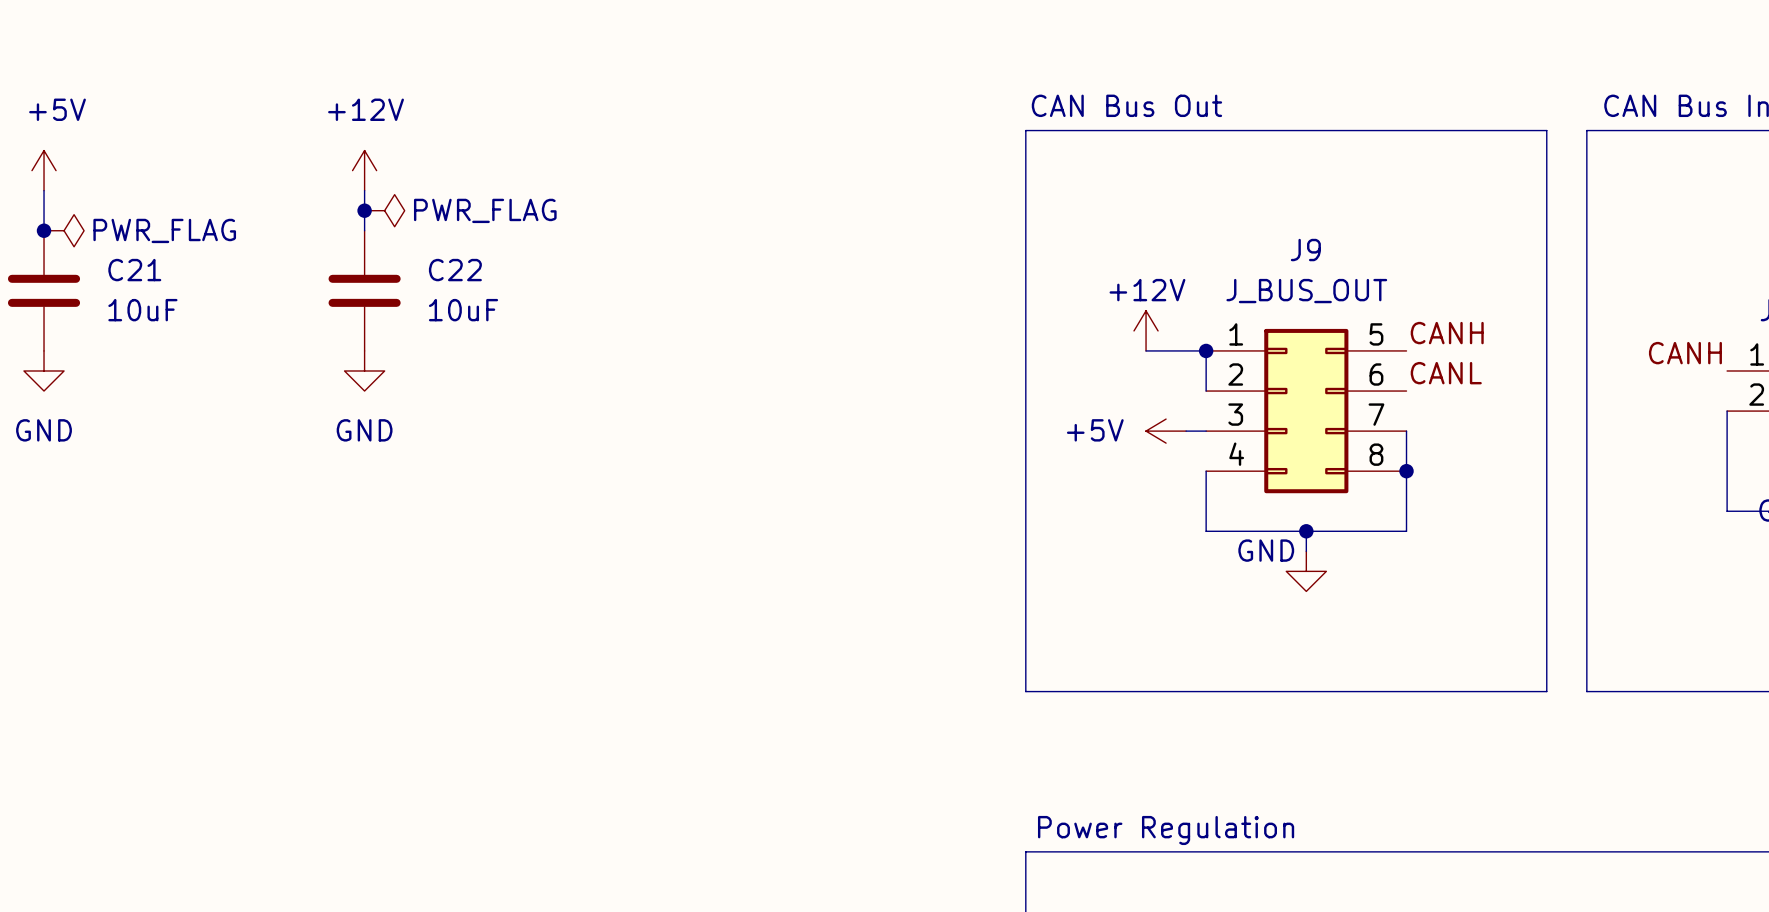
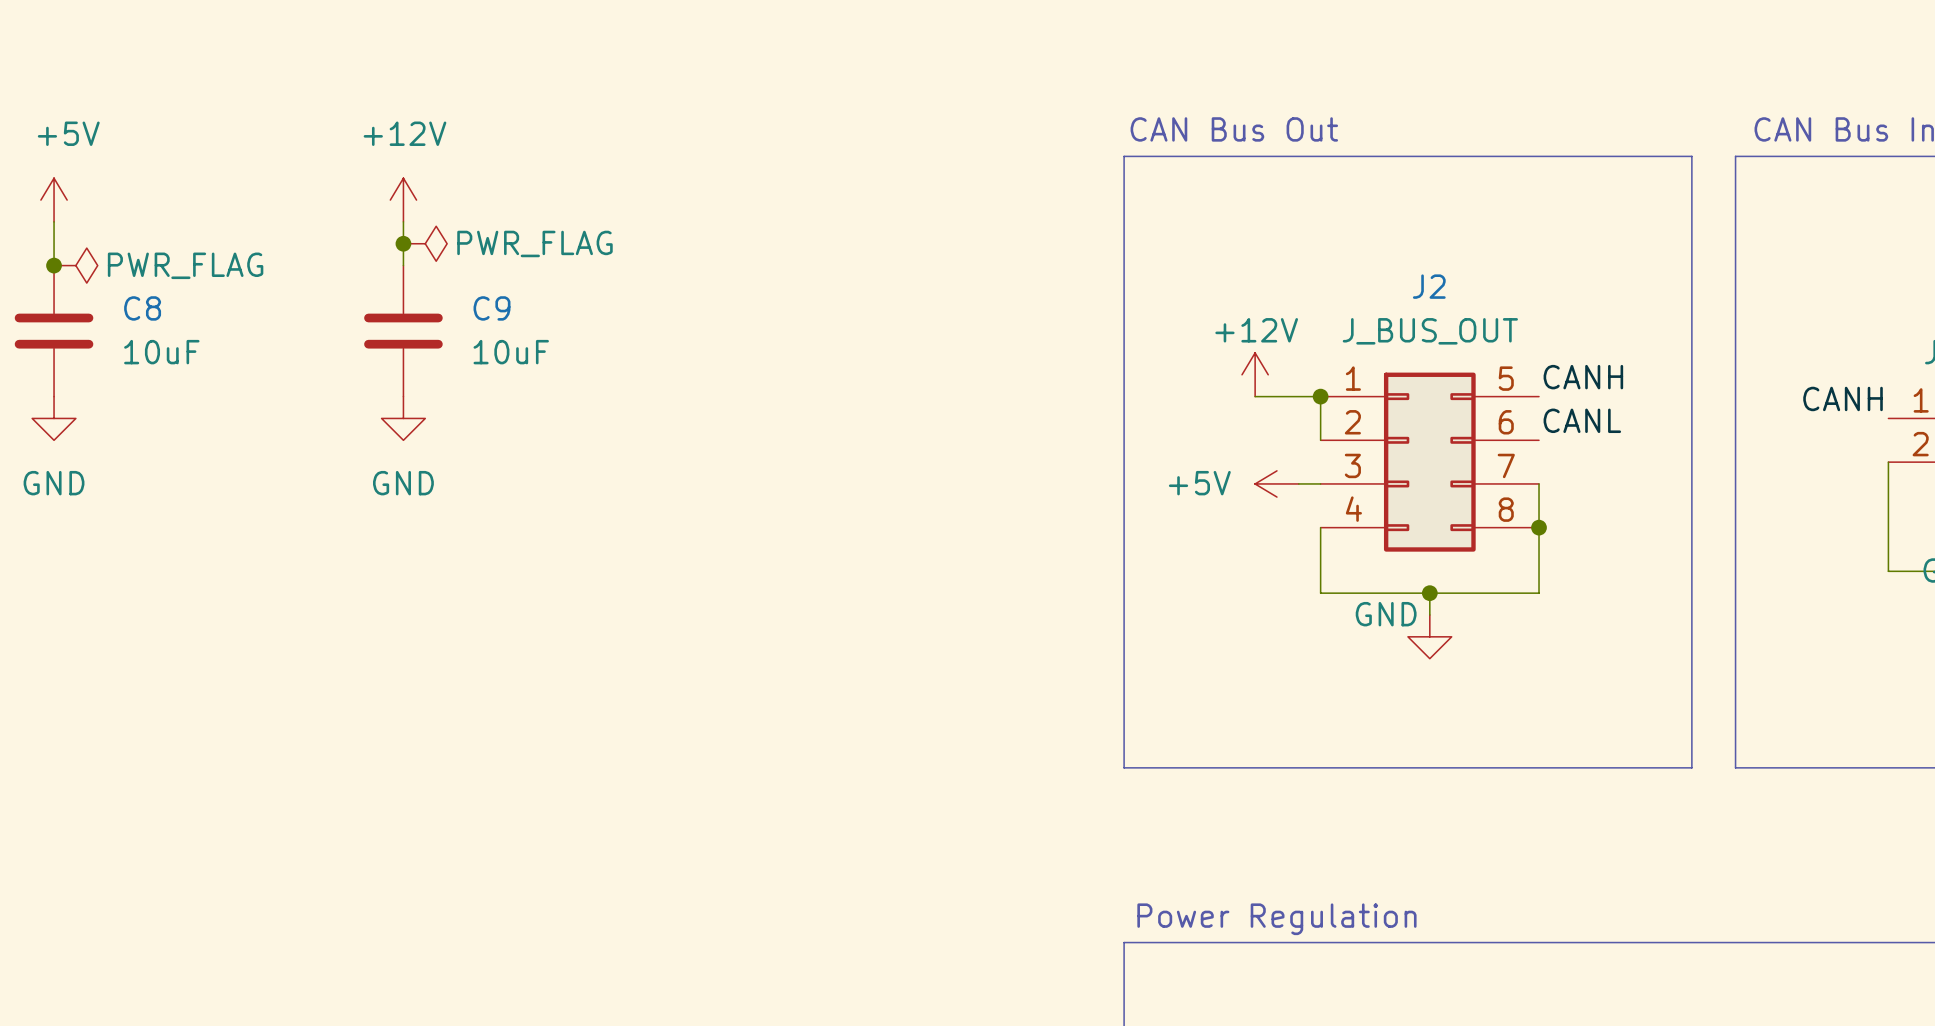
J9 name: J9 (1305, 250) -> J2 (1429, 286)
C21 name: C21 (134, 270) -> C8 (142, 308)
C22 name: C22 (455, 270) -> C9 (491, 308)

